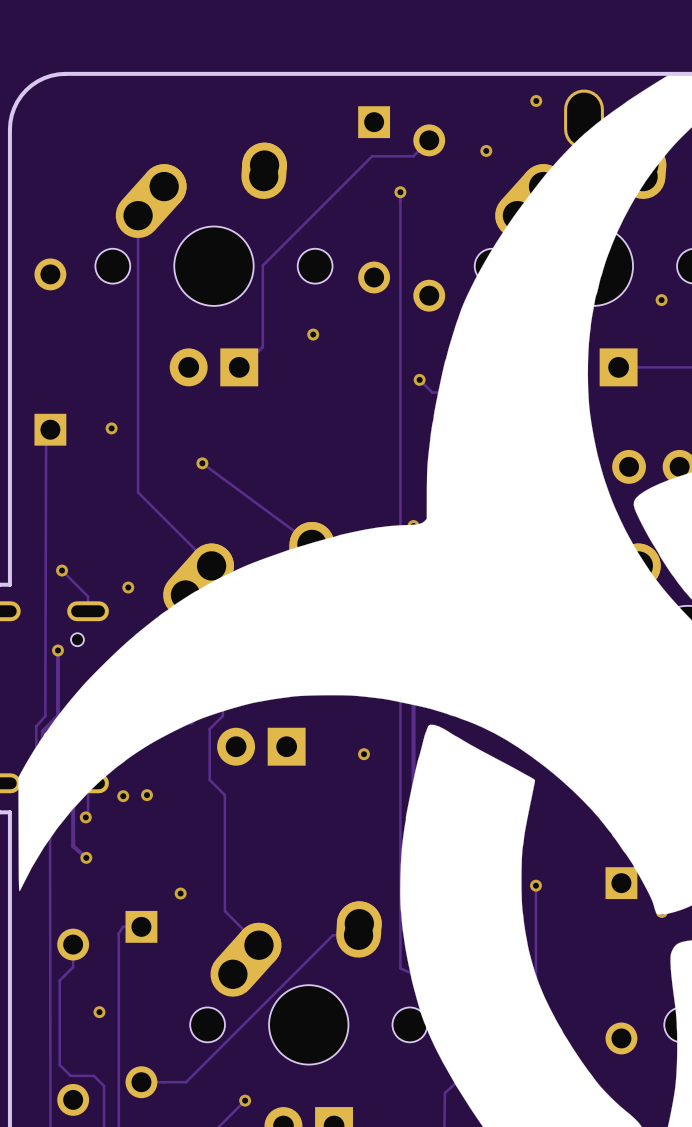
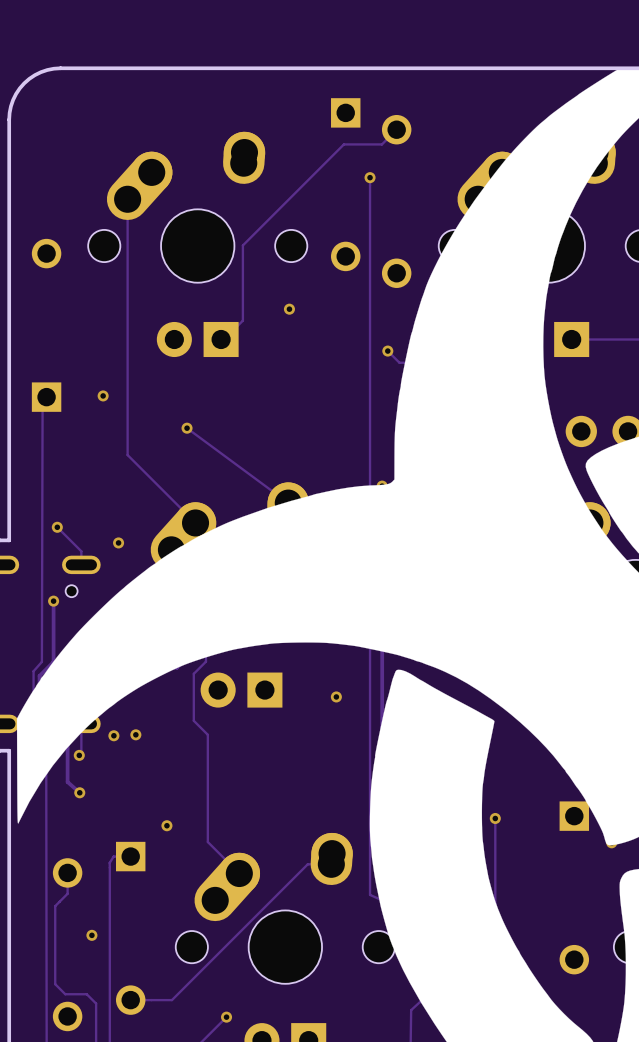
via: (536, 100) -> none
part: (584, 119) -> none
via: (486, 150) -> none
via: (661, 300) -> none

